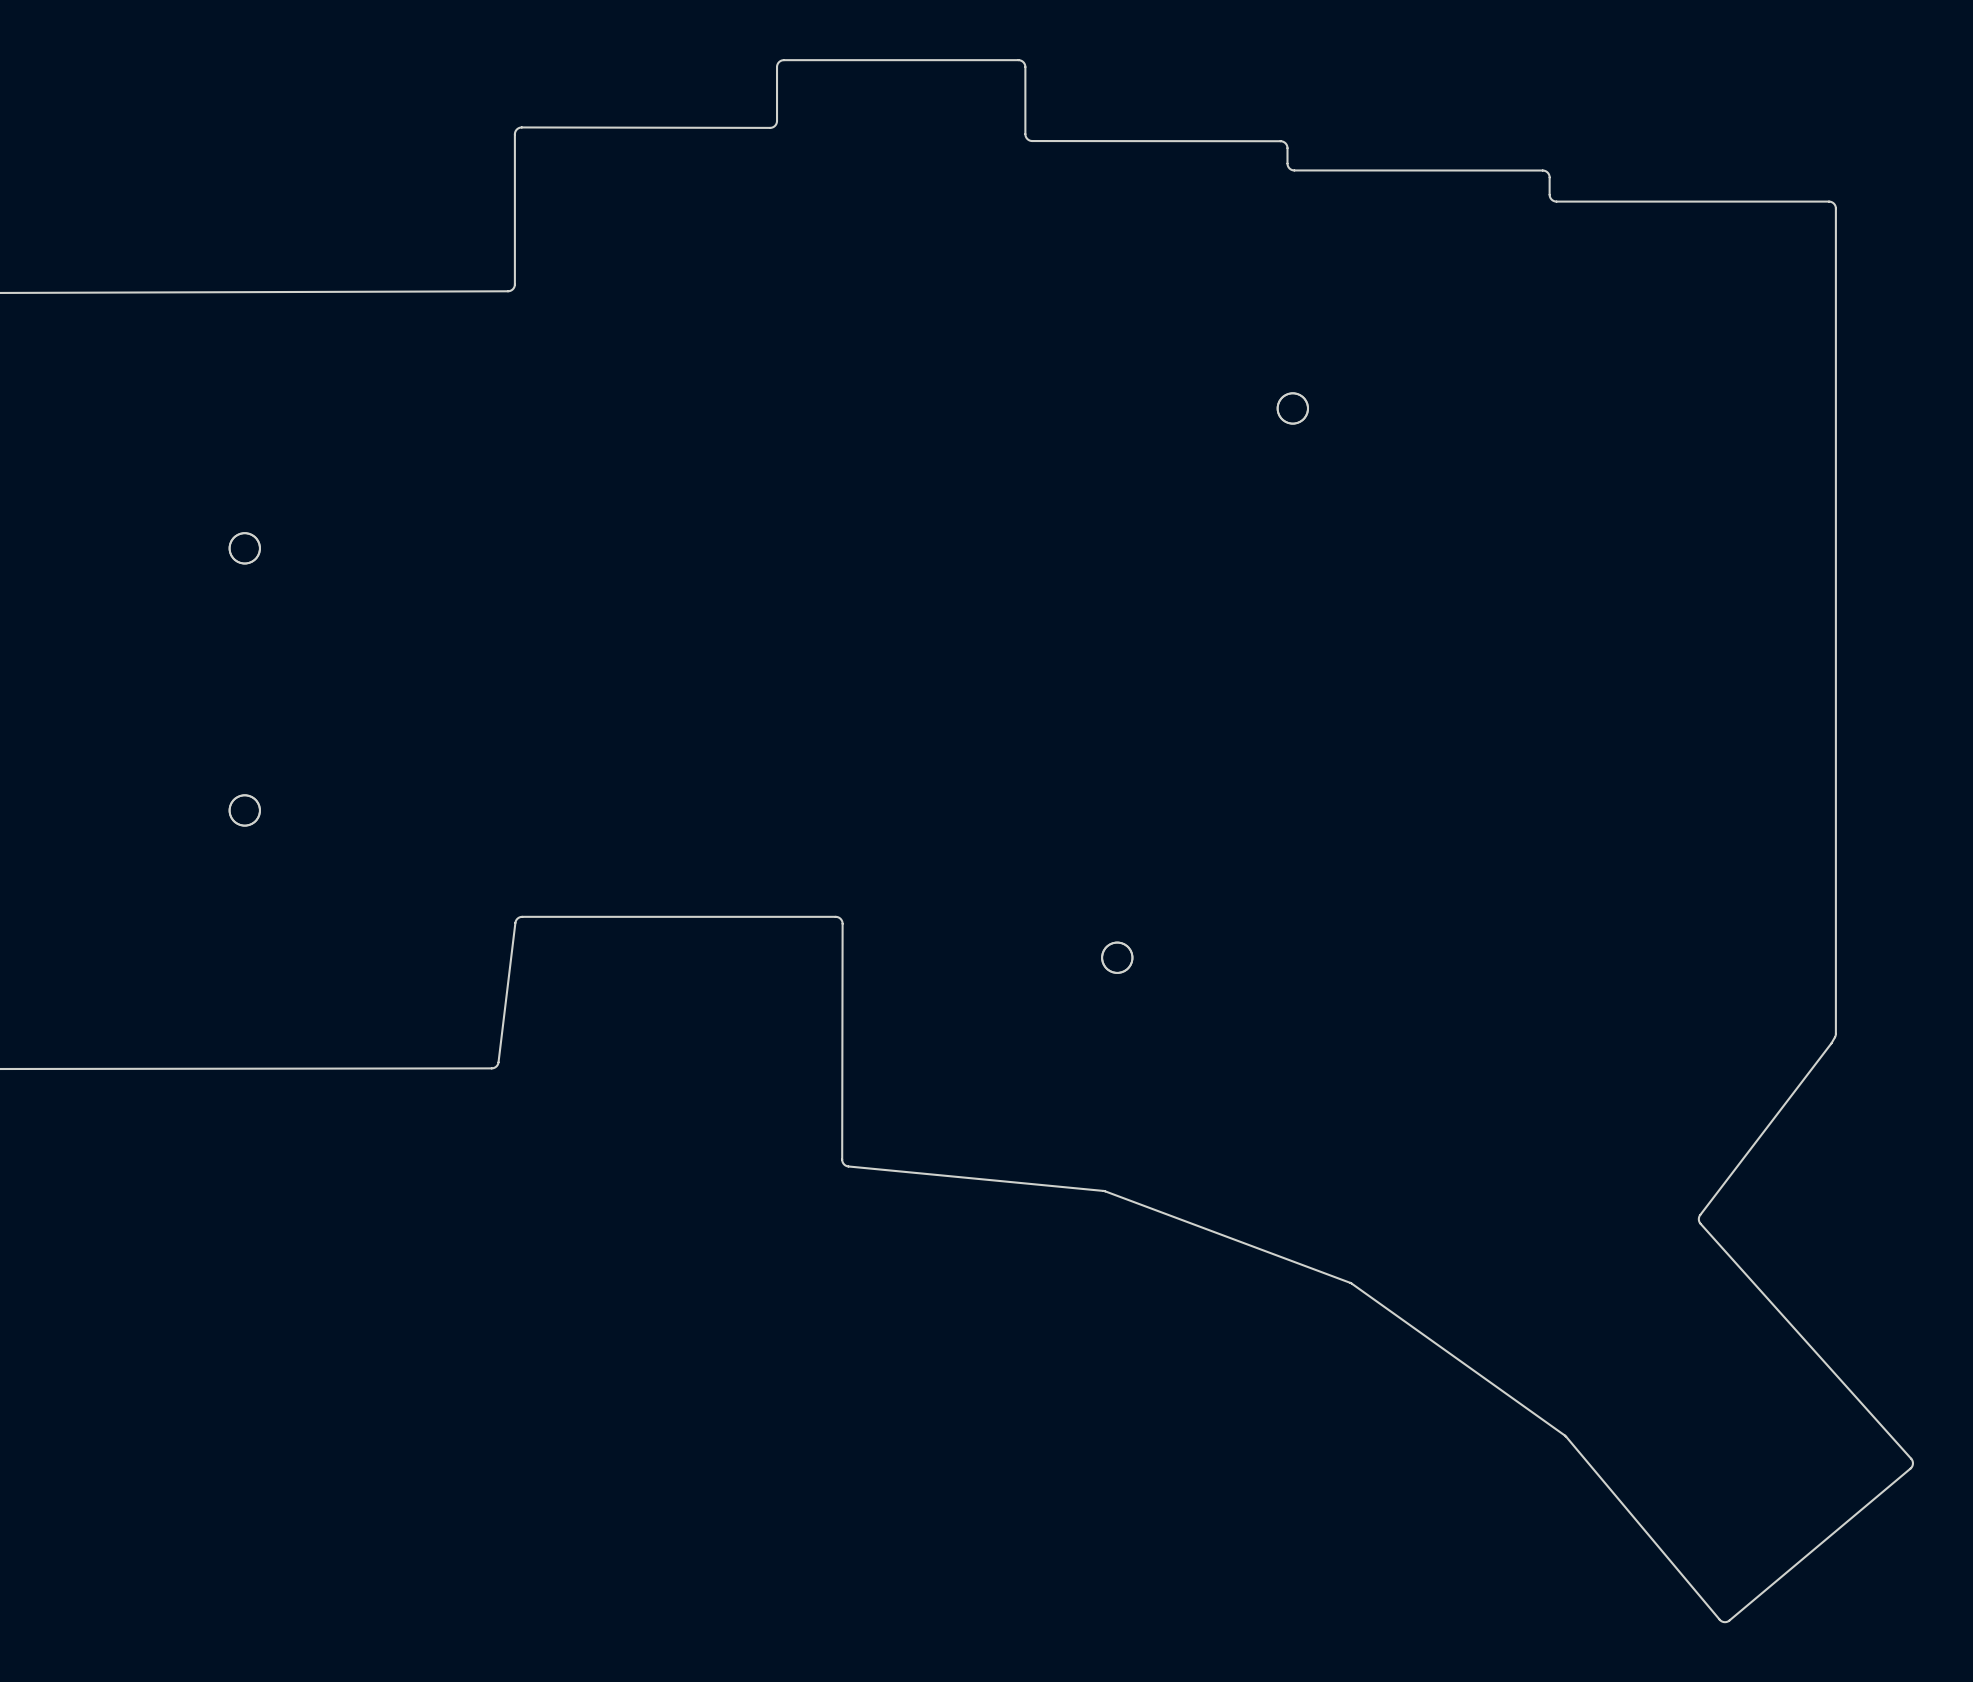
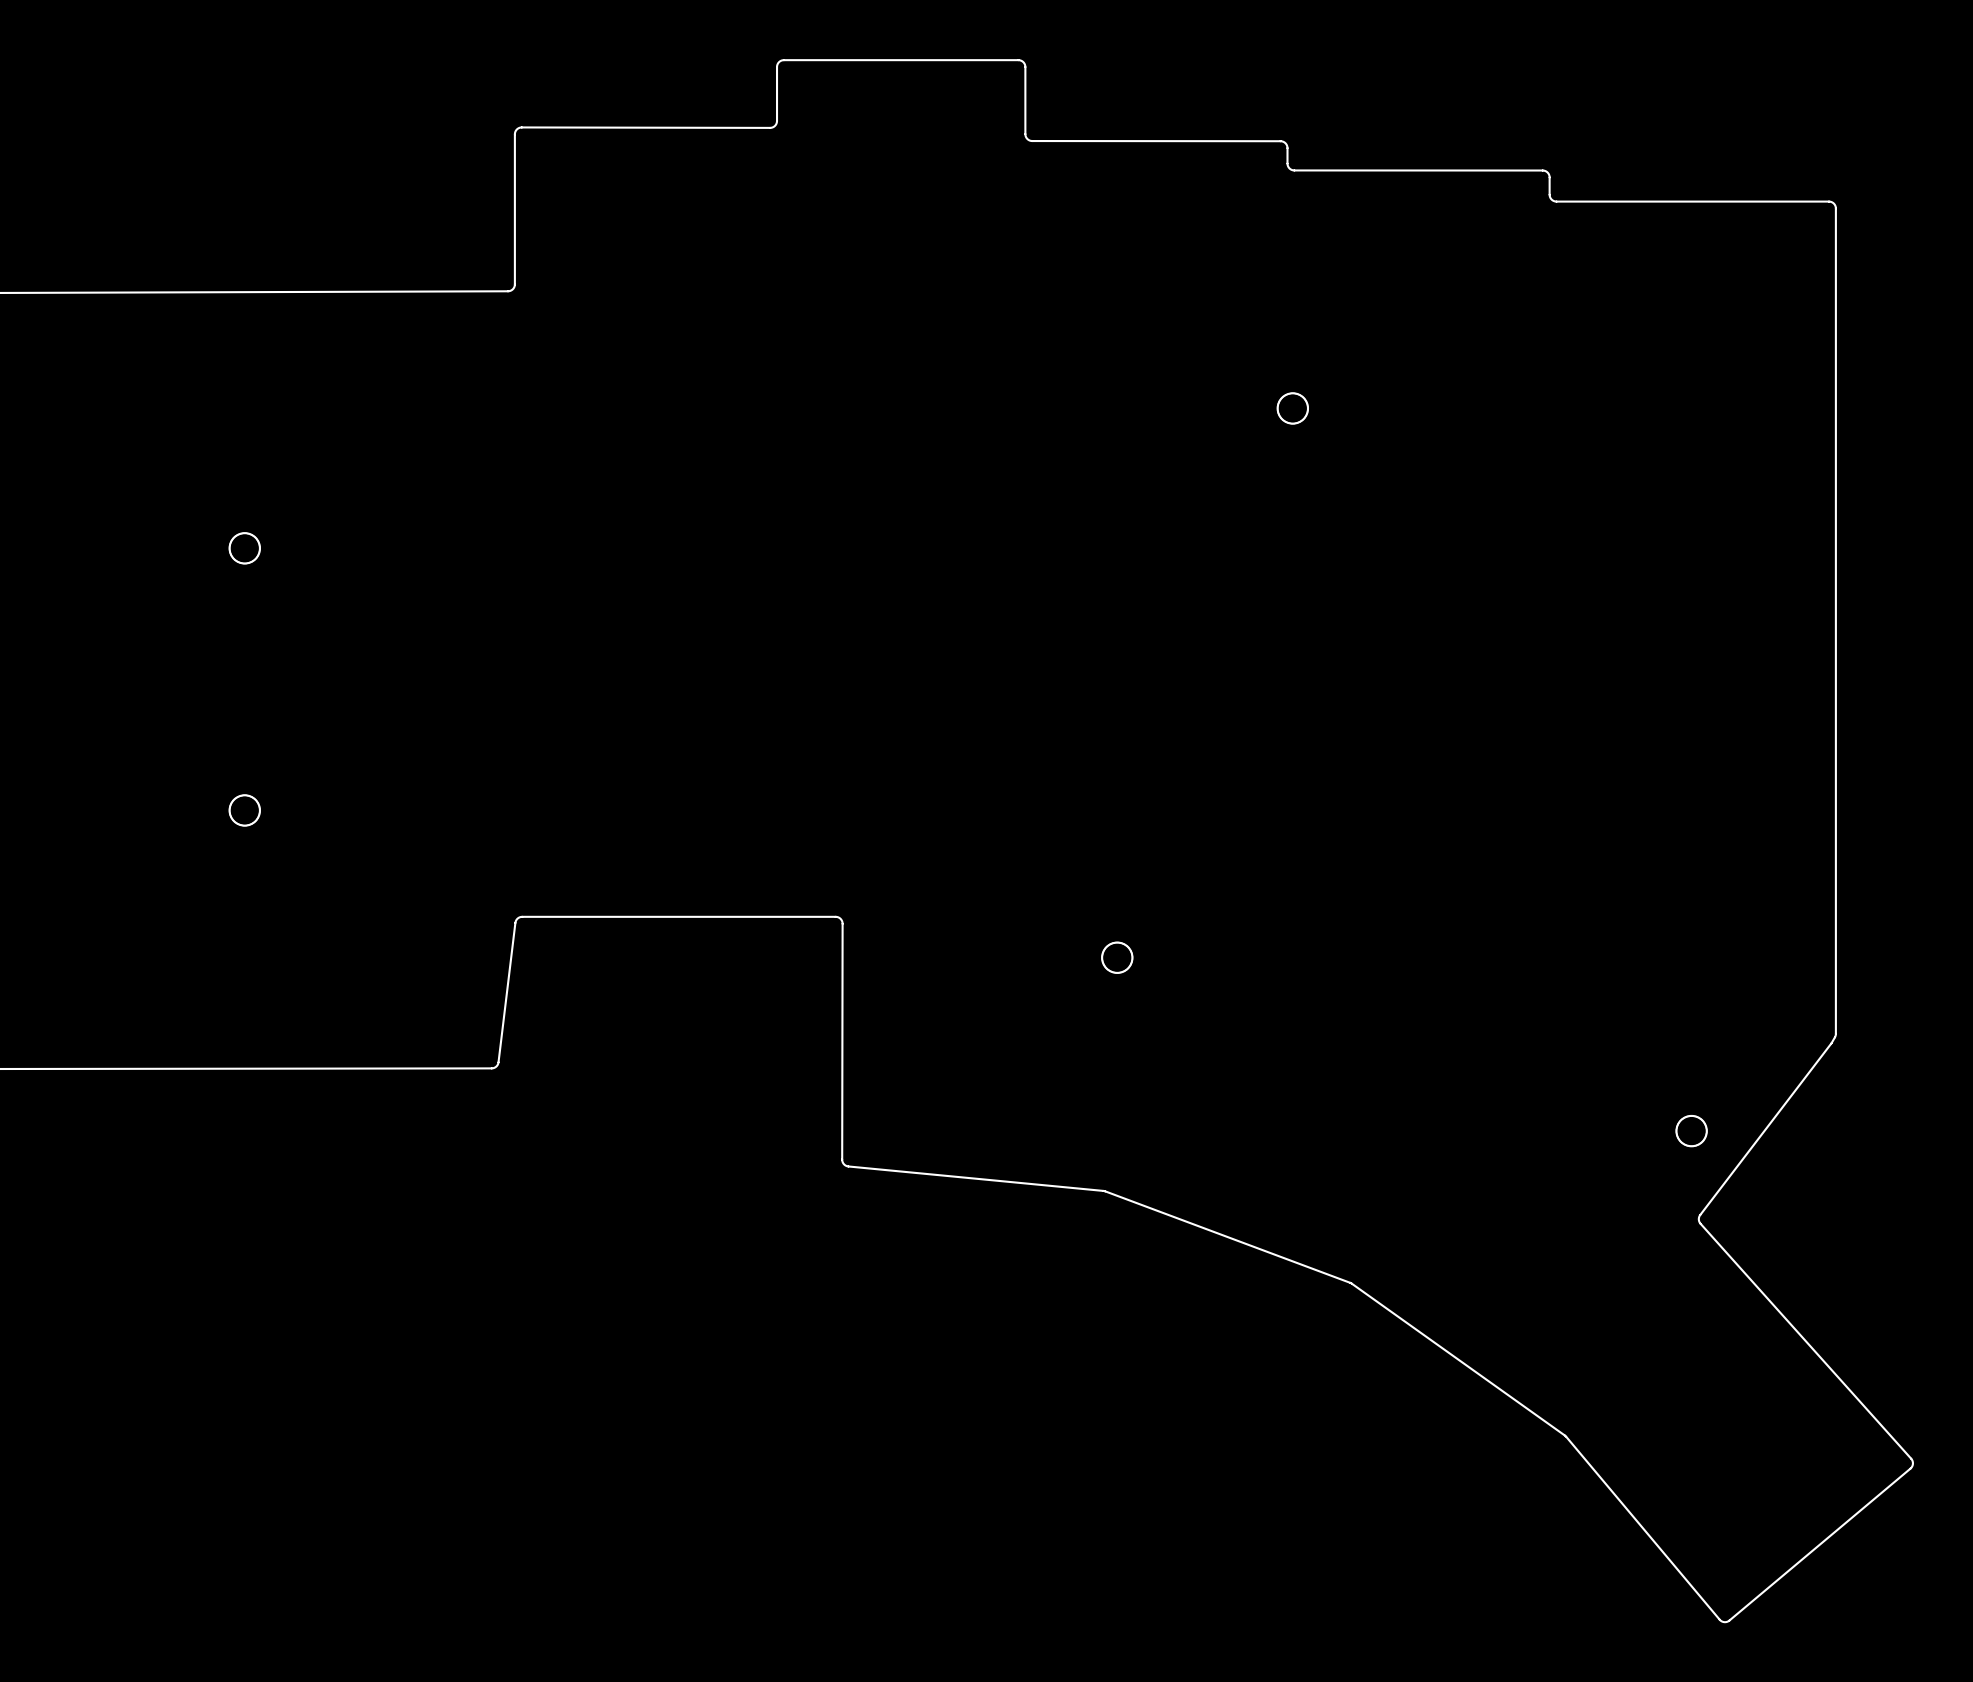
round board edge: none -> [1675, 1114, 1708, 1148]

